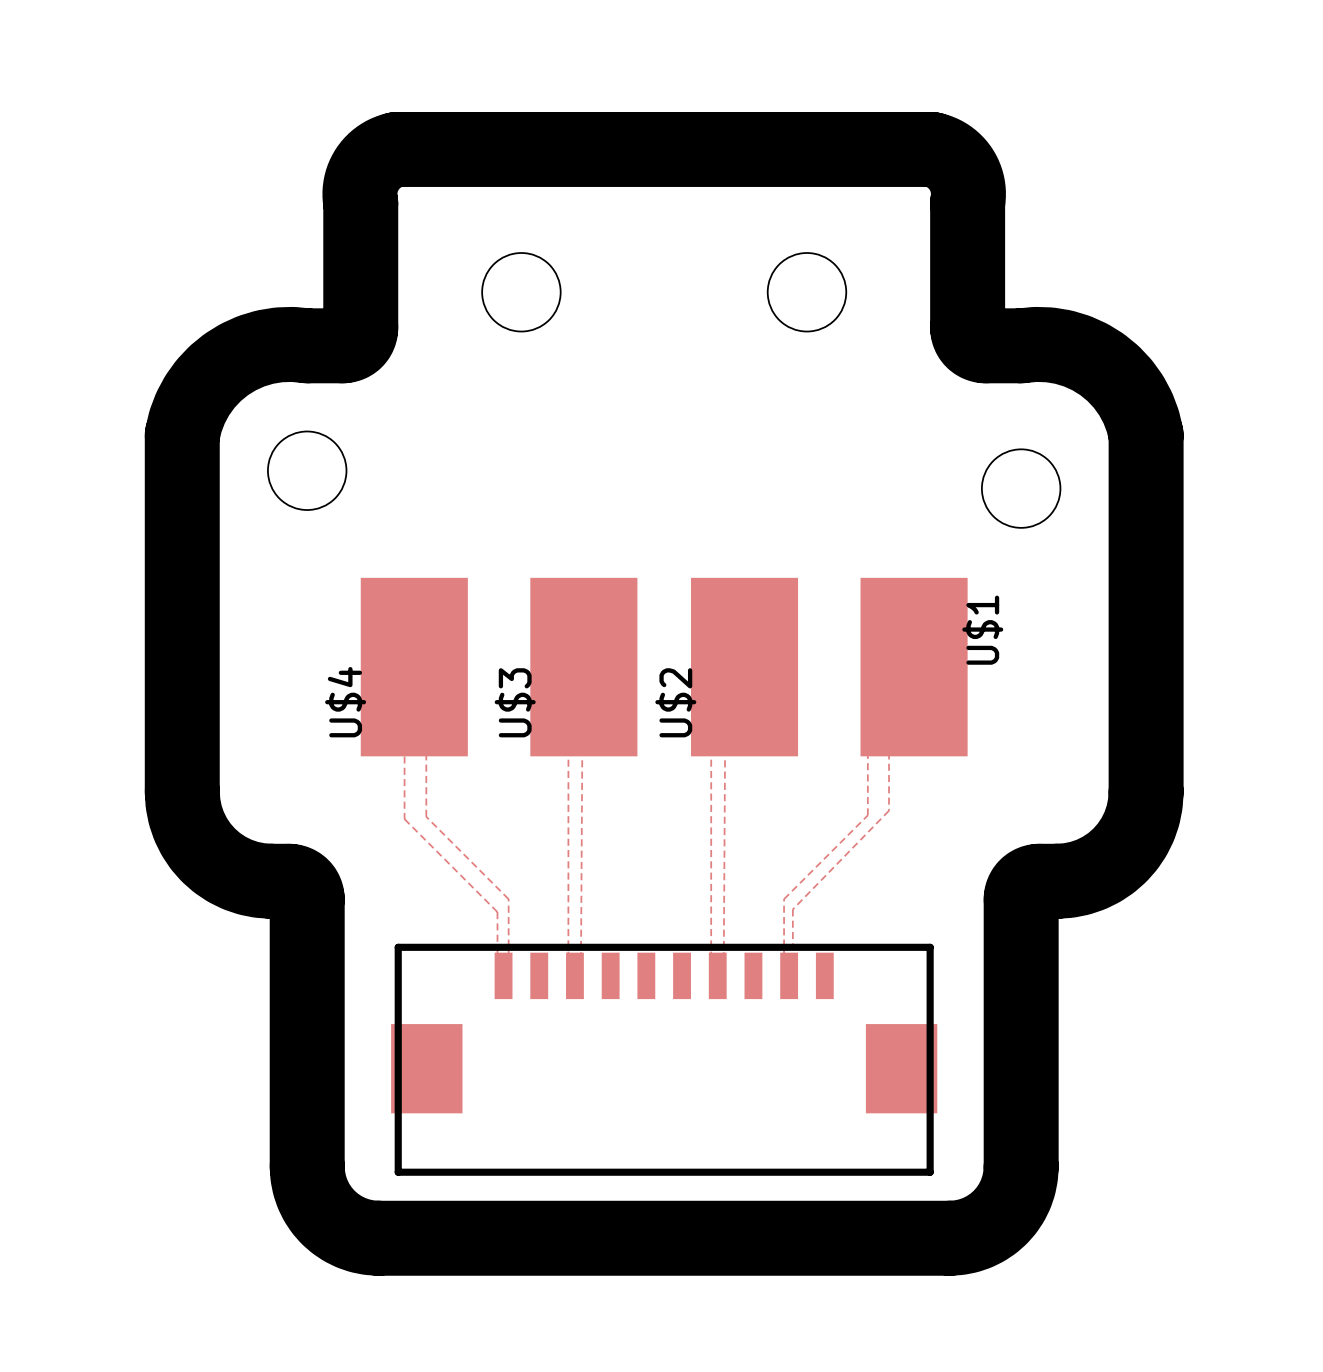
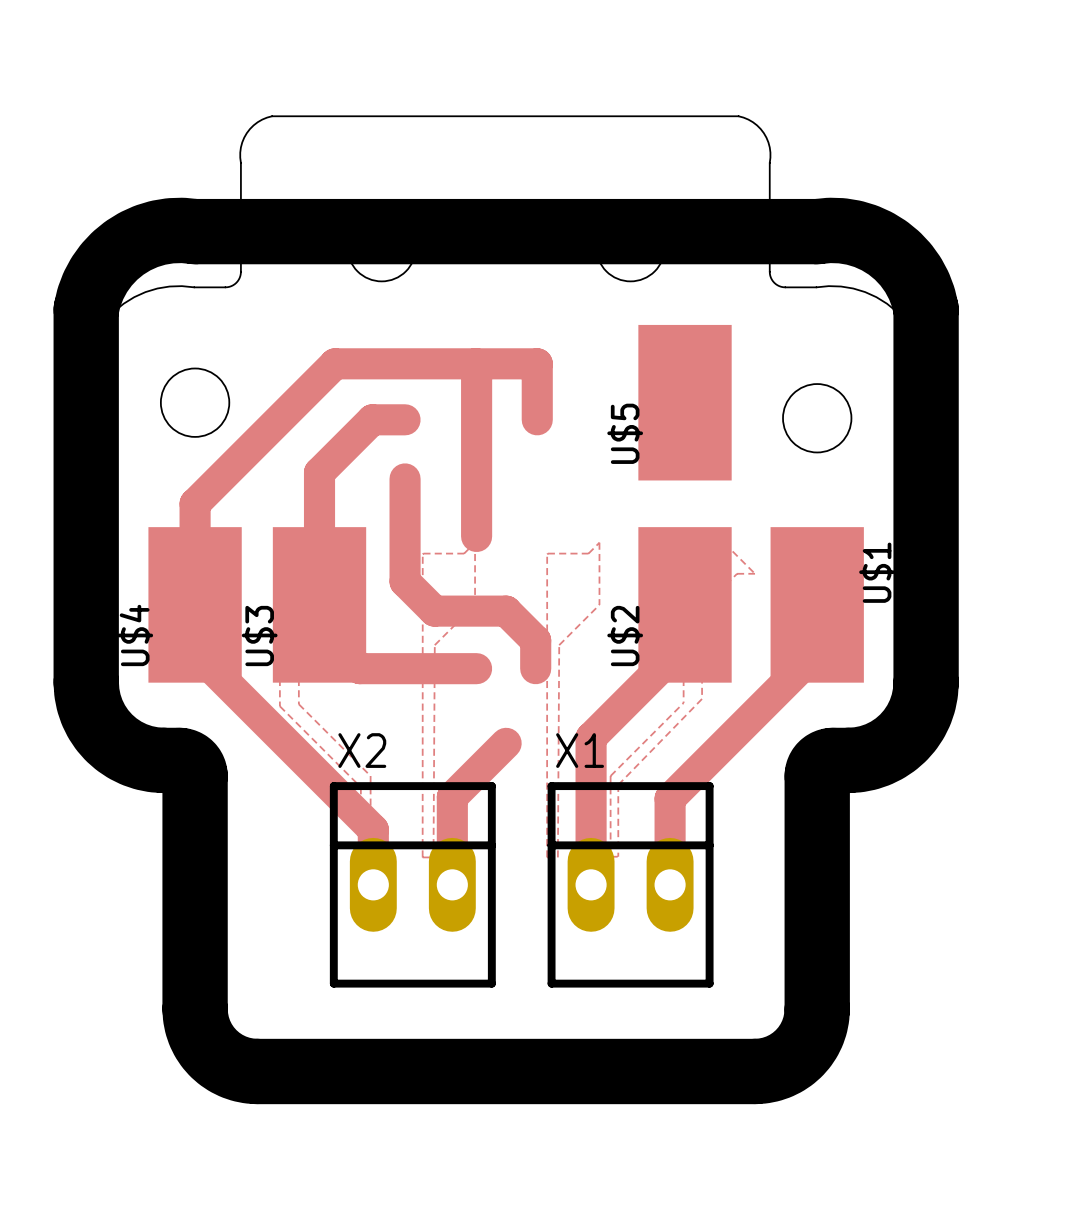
top track: none -> (476, 365) (475, 363) (335, 363) (195, 503) (195, 651) (373, 829) (373, 884)
board edge: (182, 435) (190, 407) (205, 383) (226, 364) (238, 357) (251, 351) (278, 344) (345, 345) (357, 338) (360, 327) (360, 185) (364, 174) (371, 164) (380, 156) (396, 149) (931, 149) (937, 151) (948, 156) (957, 164) (963, 174) (967, 185) (967, 327) (971, 338) (983, 345) (1049, 344) (1077, 351) (1090, 357) (1102, 364) (1122, 383) (1137, 407) (1146, 435) -> (86, 371) (86, 309) (89, 297) (99, 274) (114, 255) (135, 241) (158, 232) (182, 230) (829, 230) (854, 232) (877, 241) (897, 255) (913, 274) (918, 285) (926, 309) (926, 371)
U$5: none -> (685, 402)
top track: none -> (405, 419) (372, 419) (319, 472) (319, 604) (307, 616) (359, 668) (476, 668)
top track: none -> (537, 419) (537, 363) (476, 363) (476, 536)
top track: none -> (405, 478) (405, 581) (434, 611) (506, 611) (535, 640) (535, 668)
U$4 position: (414, 667) -> (195, 604)
U$3 position: (583, 667) -> (319, 604)
U$2 position: (744, 667) -> (685, 604)
U$1 position: (914, 667) -> (817, 604)
top track: none -> (685, 604) (685, 643) (591, 737) (591, 884)
top track: none -> (817, 604) (817, 651) (670, 798) (670, 884)
top track: none -> (506, 743) (452, 797) (452, 884)
X2: none -> (412, 884)
X1: none -> (630, 884)
part: (664, 1059) -> none

